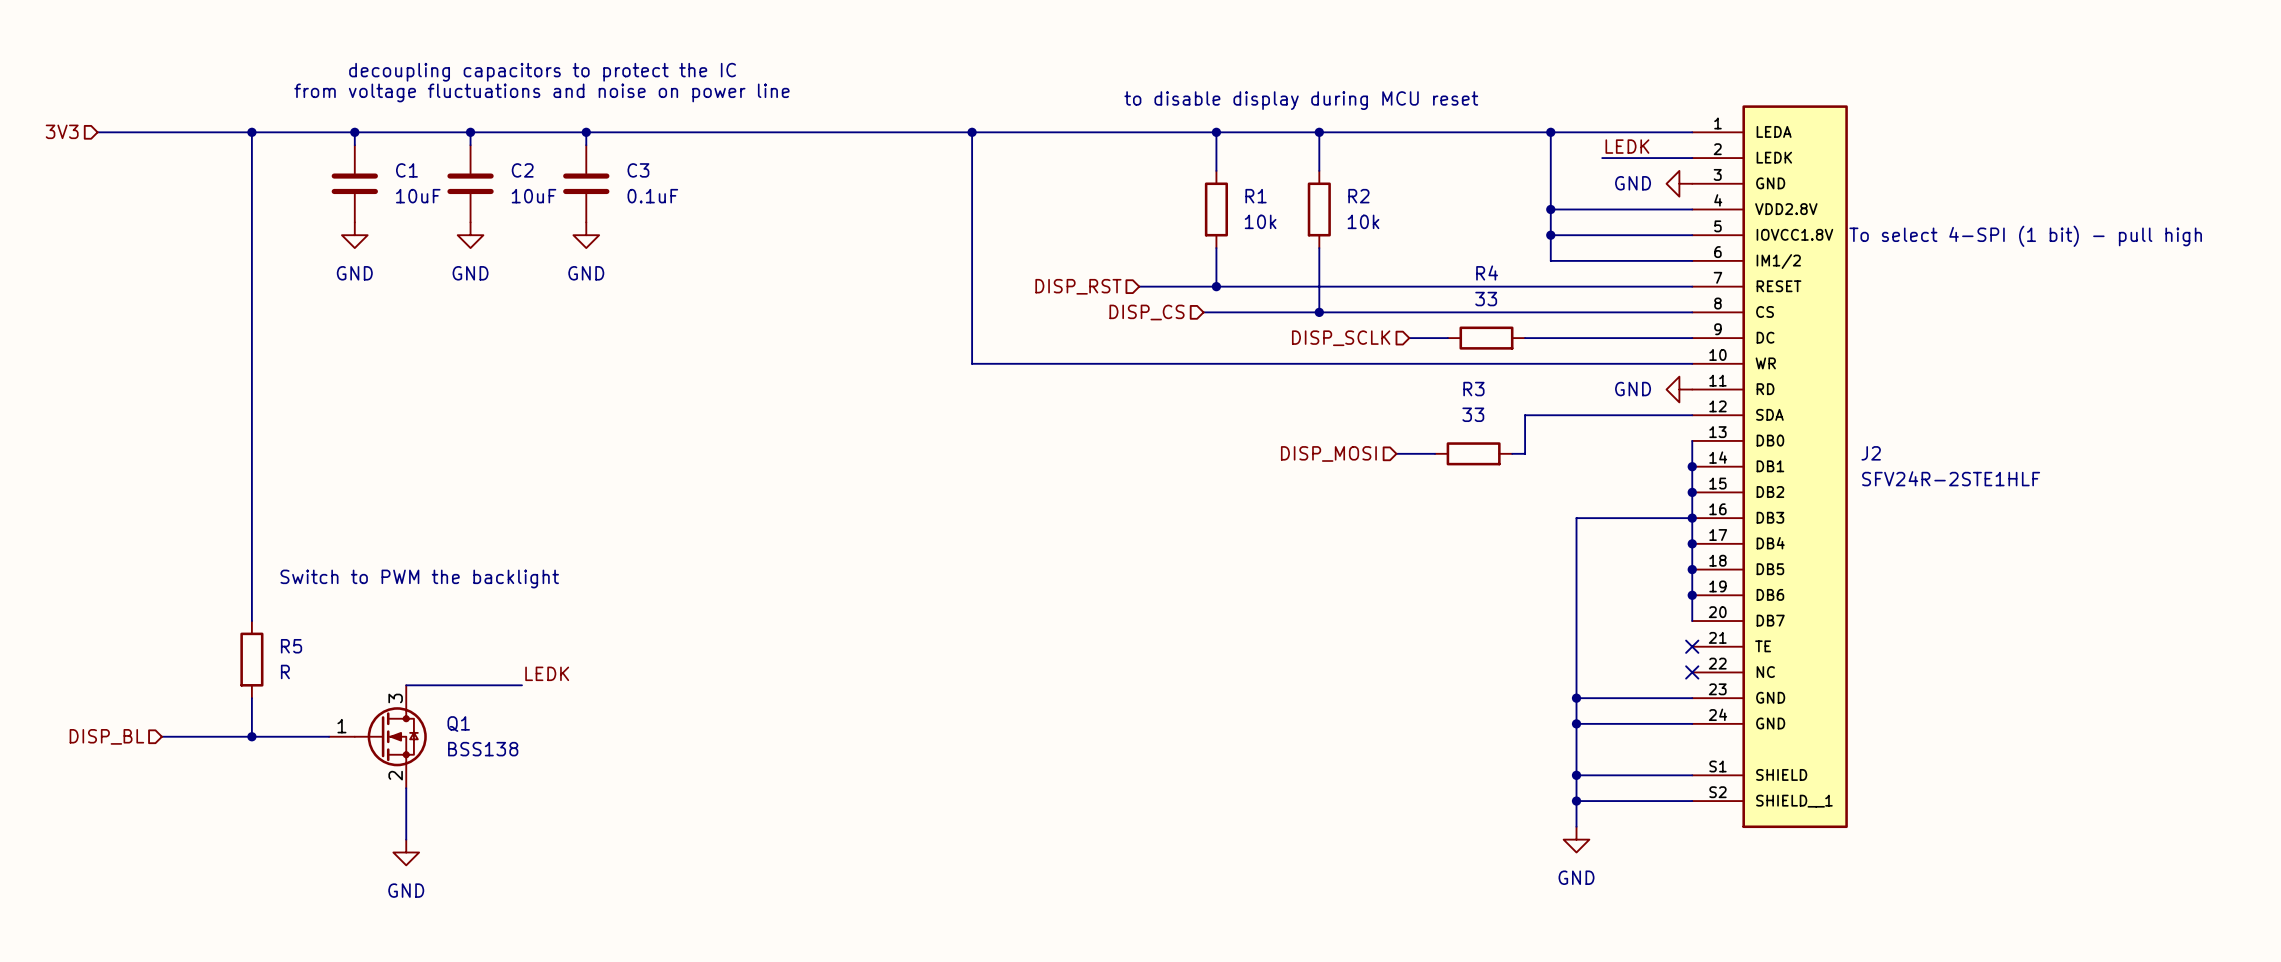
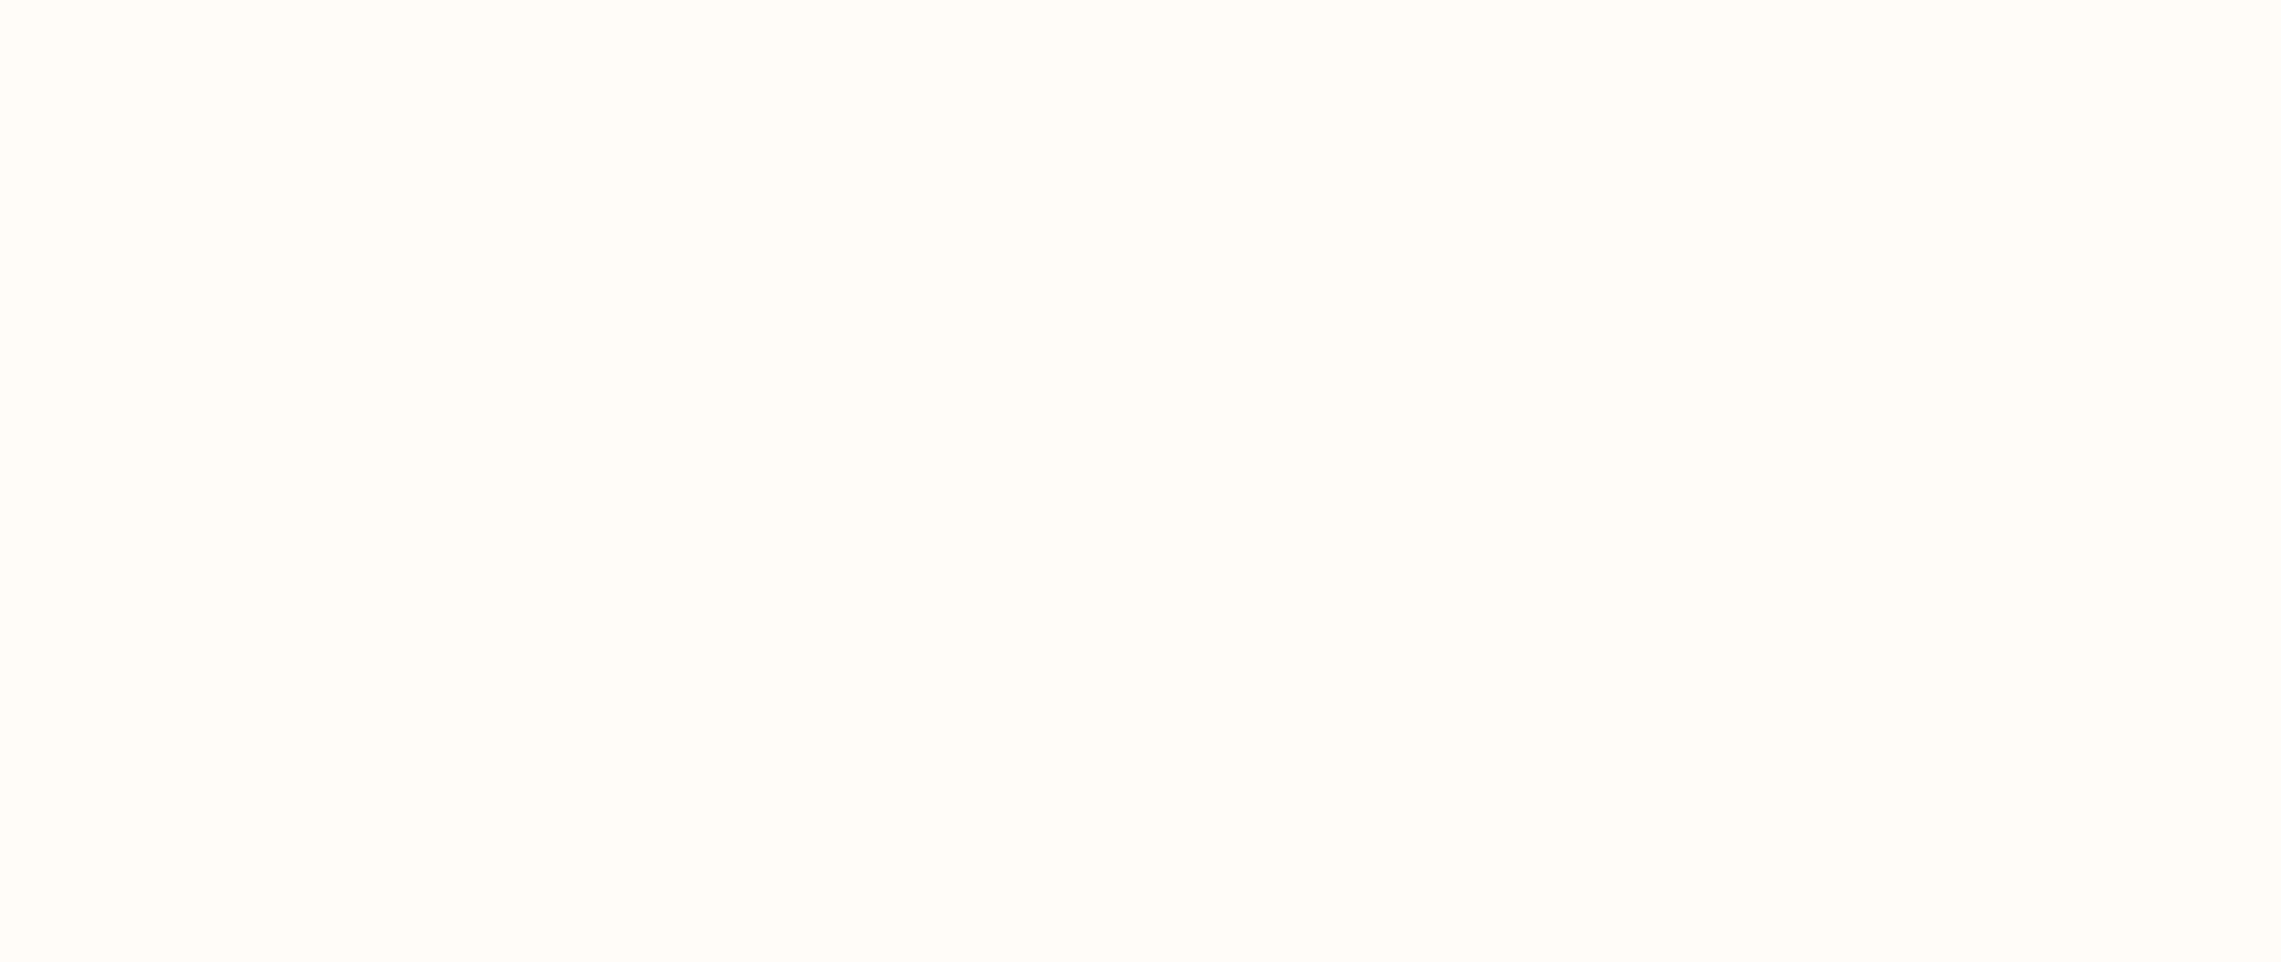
text: decoupling capacitors to protect the IC (542, 72) -> none
text: from voltage fluctuations and noise on power line (541, 92) -> none
text: to disable display during MCU reset (1301, 100) -> none
hierarchical label: 3V3 (62, 131) -> none
wire: (97, 132) (1692, 132) -> none
wire: (251, 132) (251, 621) -> none
junction: (251, 132) -> none
wire: (354, 132) (354, 145) -> none
junction: (354, 132) -> none
wire: (470, 132) (470, 145) -> none
junction: (470, 132) -> none
wire: (586, 132) (586, 145) -> none
junction: (586, 132) -> none
wire: (972, 132) (972, 363) (1692, 363) -> none
junction: (972, 132) -> none
wire: (1216, 132) (1216, 170) -> none
junction: (1216, 132) -> none
wire: (1319, 132) (1319, 170) -> none
junction: (1319, 132) -> none
wire: (1550, 132) (1550, 260) (1692, 260) -> none
junction: (1550, 132) -> none
label: LEDK (1627, 146) -> none
wire: (1602, 158) (1692, 158) -> none
C1: 10uF (354, 183) -> none
C2: 10uF (470, 183) -> none
C3: 0.1uF (586, 183) -> none
power symbol: GND (1679, 183) -> none
R1: 10k (1216, 209) -> none
R2: 10k (1319, 209) -> none
wire: (1550, 209) (1692, 209) -> none
junction: (1550, 209) -> none
power symbol: GND (354, 235) -> none
power symbol: GND (470, 235) -> none
power symbol: GND (586, 235) -> none
wire: (1550, 235) (1692, 235) -> none
junction: (1550, 235) -> none
text: To select 4-SPI (1 bit) - pull high (2025, 236) -> none
wire: (1216, 248) (1216, 286) -> none
wire: (1319, 248) (1319, 312) -> none
hierarchical label: DISP_RST (1078, 286) -> none
wire: (1139, 286) (1692, 286) -> none
junction: (1216, 286) -> none
hierarchical label: DISP_CS (1147, 312) -> none
wire: (1203, 312) (1692, 312) -> none
junction: (1319, 312) -> none
hierarchical label: DISP_SCLK (1341, 338) -> none
wire: (1409, 338) (1447, 338) -> none
R4: 33 (1486, 338) -> none
wire: (1525, 338) (1692, 338) -> none
power symbol: GND (1679, 389) -> none
wire: (1692, 415) (1525, 415) (1525, 453) (1512, 453) -> none
wire: (1692, 440) (1692, 621) -> none
hierarchical label: DISP_MOSI (1328, 453) -> none
wire: (1396, 453) (1435, 453) -> none
R3: 33 (1473, 453) -> none
junction: (1692, 466) -> none
J2: SFV24R-2STE1HLF (1770, 466) -> none
junction: (1692, 492) -> none
wire: (1692, 518) (1576, 518) (1576, 826) -> none
junction: (1692, 518) -> none
junction: (1692, 543) -> none
junction: (1692, 569) -> none
text: Switch to PWM the backlight (419, 578) -> none
junction: (1692, 595) -> none
no-connect mark: (1692, 646) -> none
R5: R (251, 659) -> none
no-connect mark: (1692, 672) -> none
label: LEDK (547, 673) -> none
wire: (406, 685) (521, 685) -> none
wire: (251, 698) (251, 736) -> none
wire: (1576, 698) (1692, 698) -> none
junction: (1576, 698) -> none
wire: (1576, 723) (1692, 723) -> none
junction: (1576, 723) -> none
hierarchical label: DISP_BL (106, 736) -> none
wire: (161, 736) (329, 736) -> none
junction: (251, 736) -> none
Q1: BSS138 (377, 736) -> none
wire: (1576, 775) (1692, 775) -> none
junction: (1576, 775) -> none
wire: (406, 788) (406, 839) -> none
wire: (1576, 801) (1692, 801) -> none
junction: (1576, 801) -> none
power symbol: GND (1576, 839) -> none
power symbol: GND (406, 852) -> none

